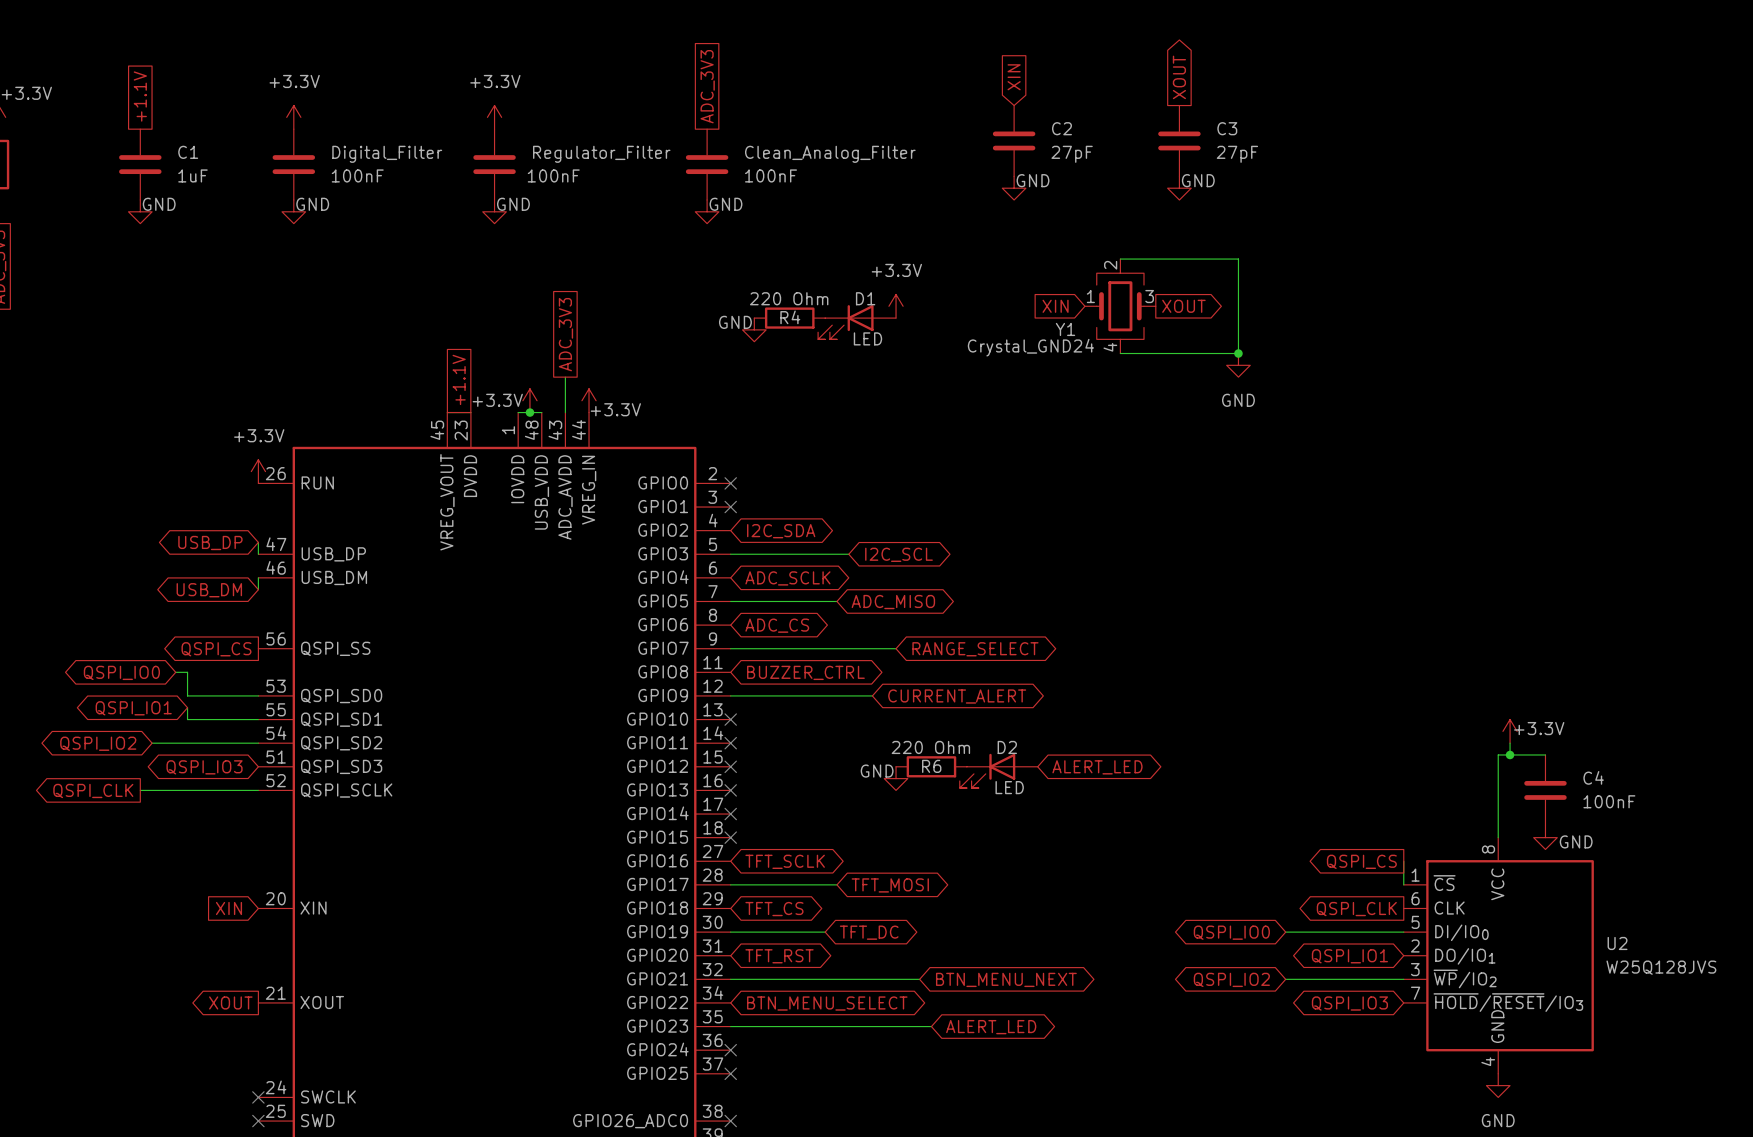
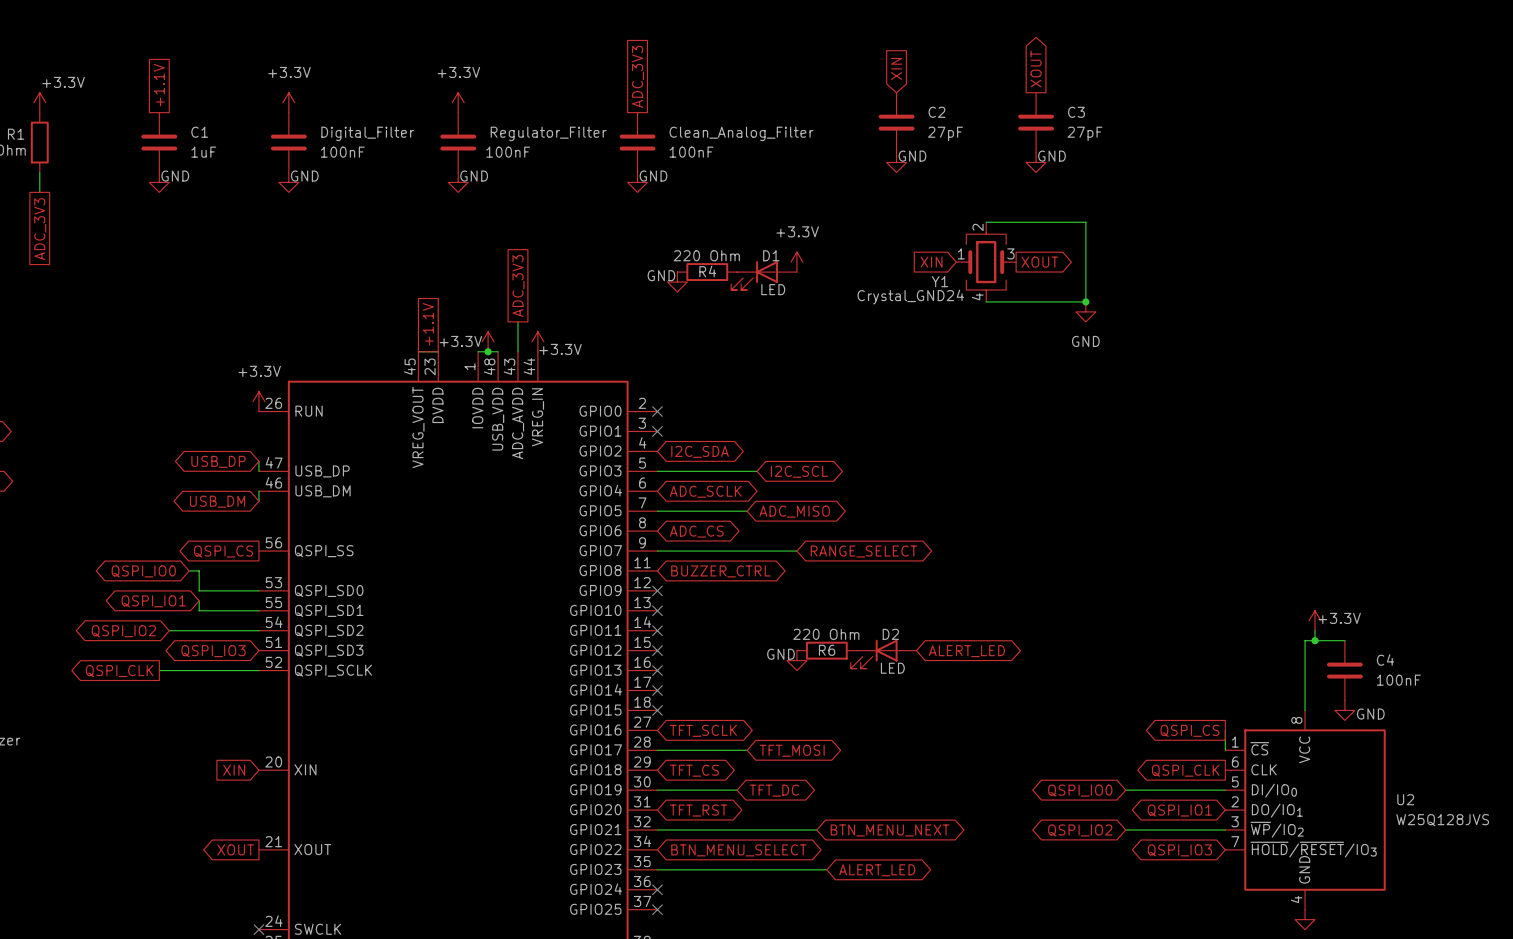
wire: (730, 695) (872, 695) -> none
no-connect mark: none -> (657, 590)
global label: CURRENT_ALERT (957, 696) -> none

